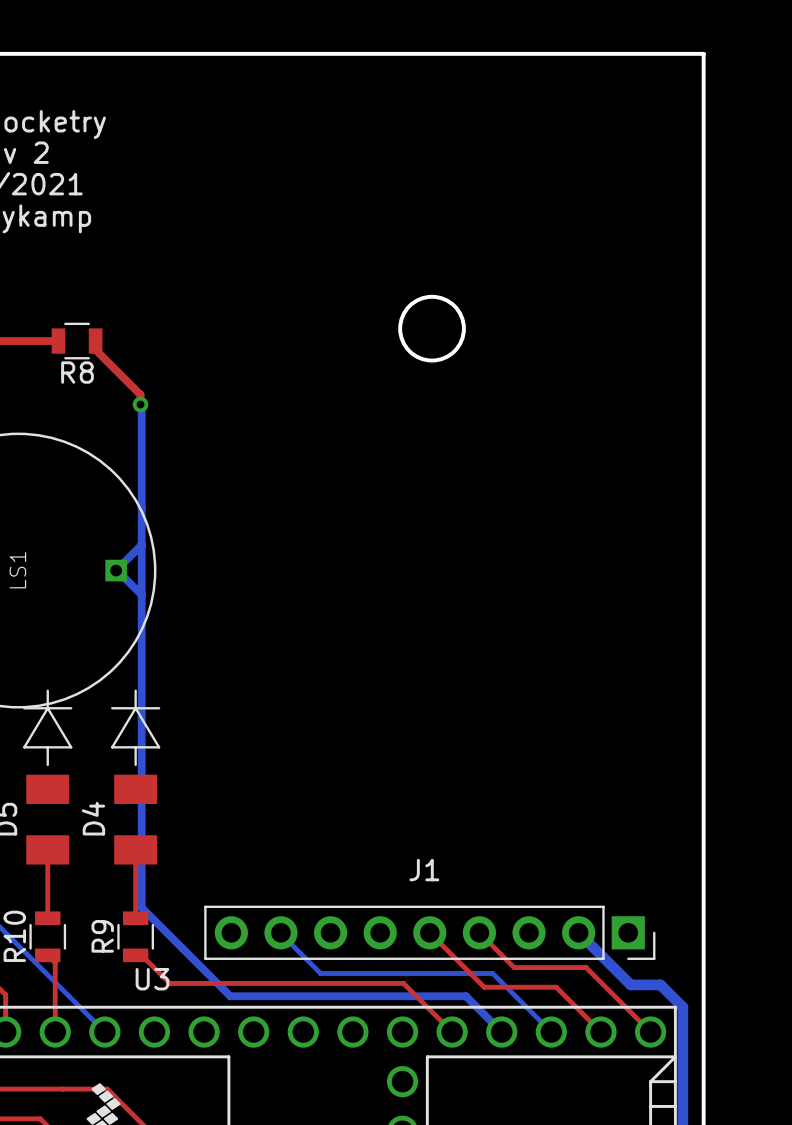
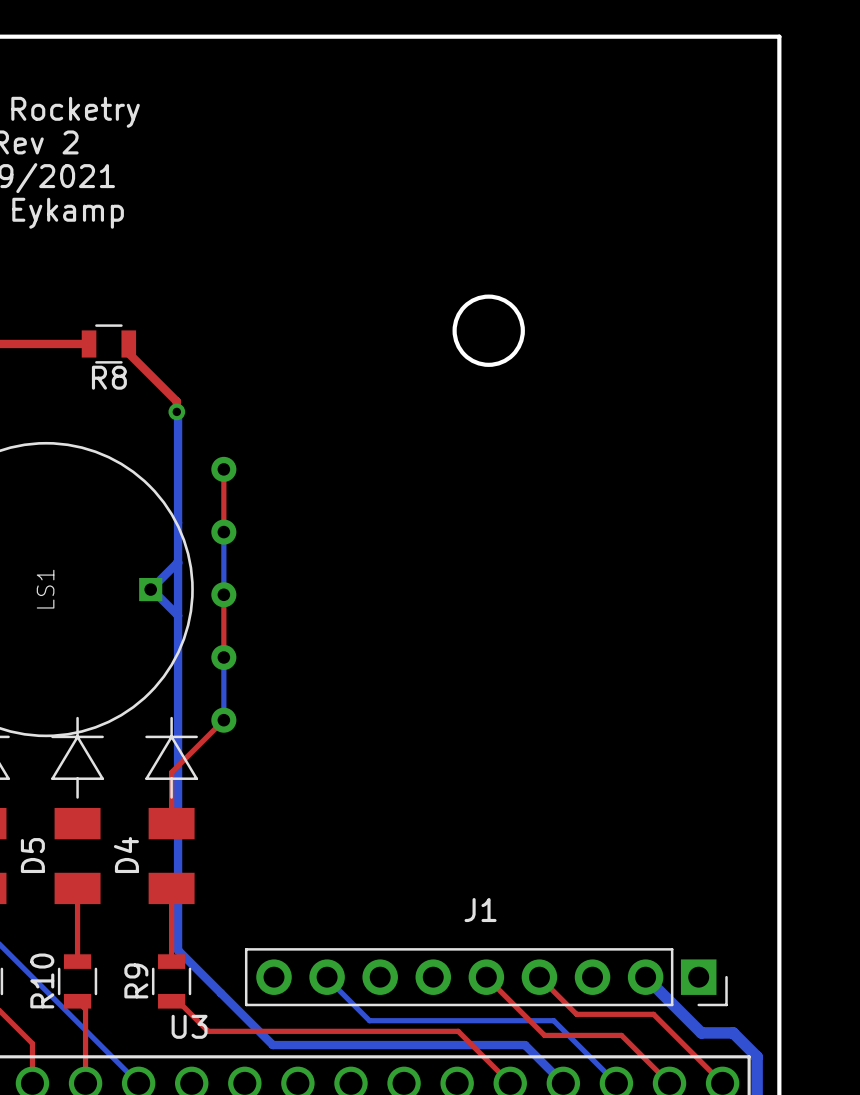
top track: none -> (223, 469) (223, 532)
via: none -> (223, 469)
bottom track: none -> (223, 532) (223, 594)
via: none -> (223, 532)
top track: none -> (223, 594) (223, 657)
via: none -> (223, 594)
bottom track: none -> (223, 657) (223, 720)
via: none -> (223, 657)
top track: none -> (223, 720) (171, 772) (171, 823)
via: none -> (223, 720)

